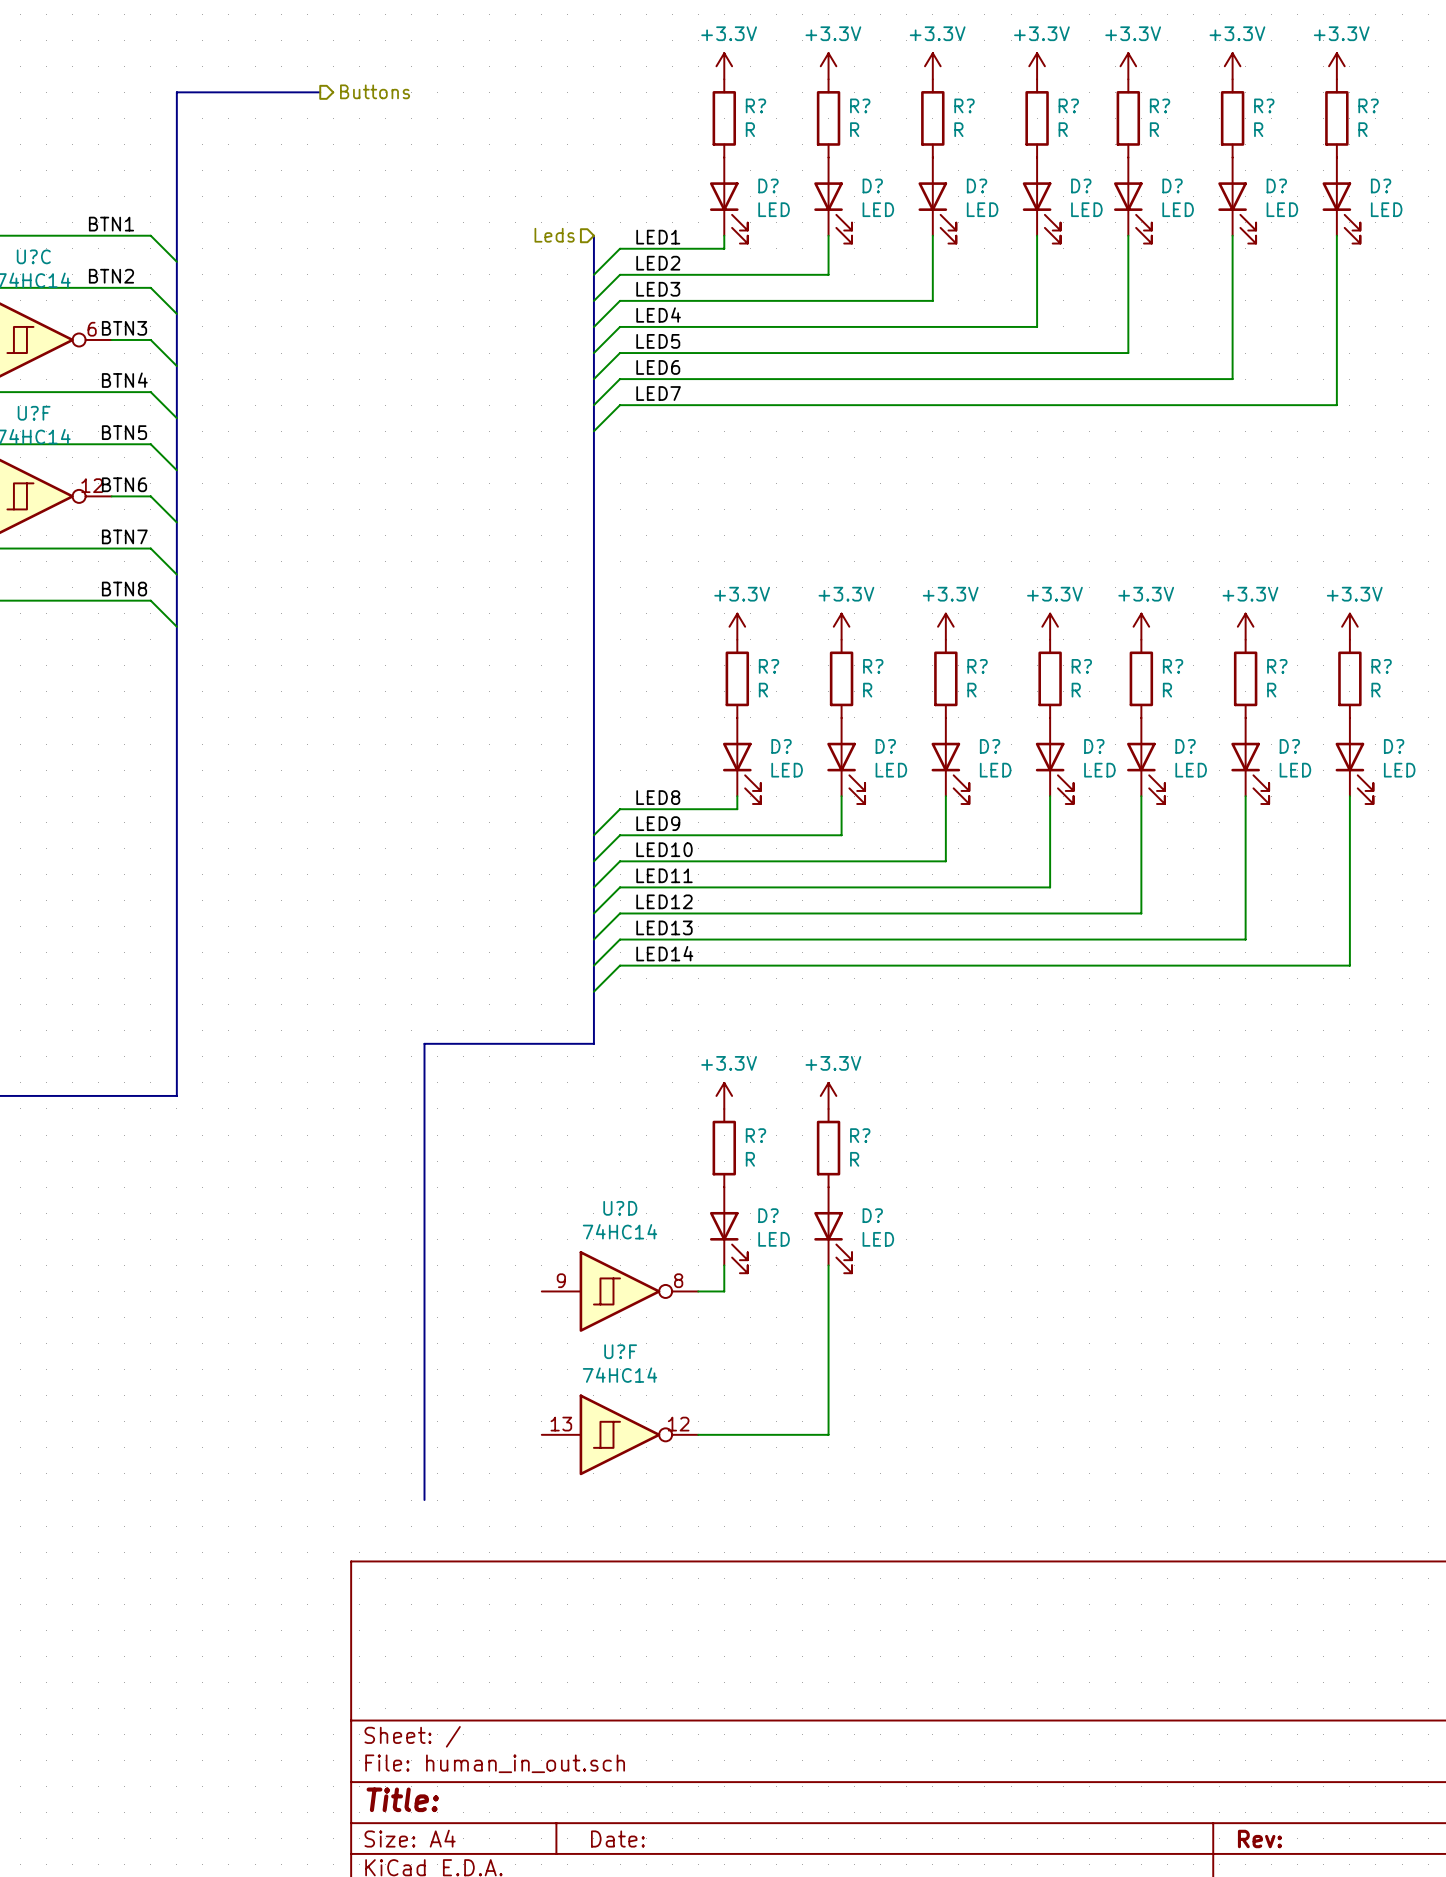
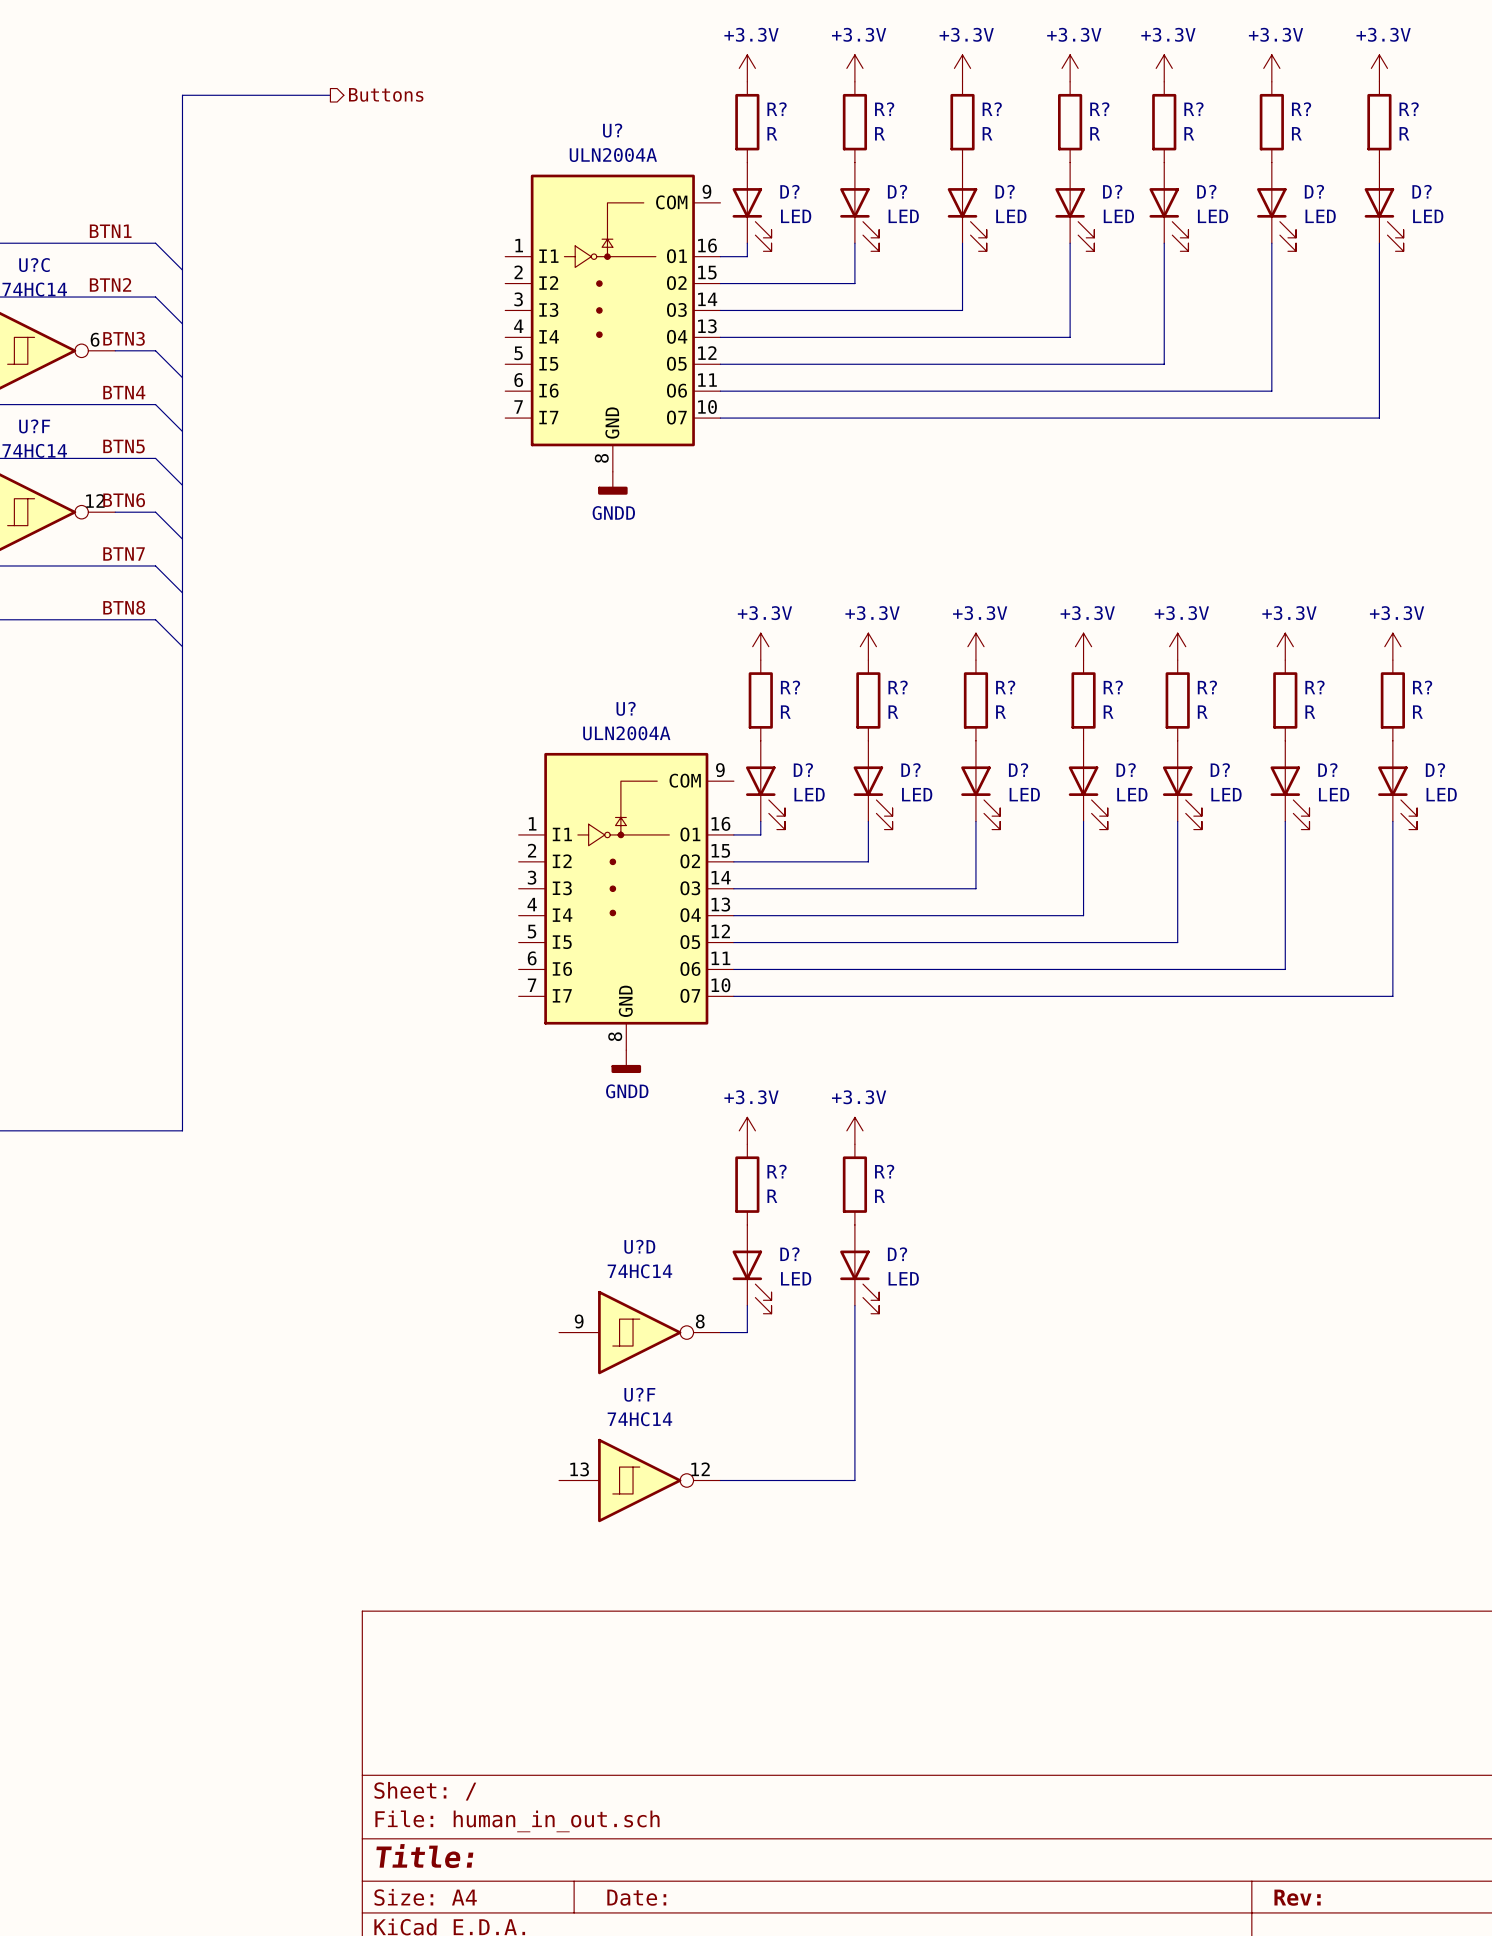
hierarchical label: Leds (554, 235) -> none
bus: (593, 235) (593, 1043) (424, 1043) (424, 1500) -> none
label: LED1 (658, 237) -> none
label: LED2 (658, 263) -> none
label: LED3 (658, 289) -> none
U?: none -> ULN2004A (612, 323)
label: LED4 (658, 315) -> none
label: LED5 (658, 341) -> none
label: LED6 (658, 367) -> none
label: LED7 (658, 393) -> none
power symbol: none -> GNDD (612, 483)
label: LED8 (658, 797) -> none
label: LED9 (658, 823) -> none
label: LED10 (664, 849) -> none
U?: none -> ULN2004A (626, 901)
label: LED11 (664, 875) -> none
label: LED12 (664, 901) -> none
label: LED13 (664, 927) -> none
label: LED14 (664, 953) -> none
power symbol: none -> GNDD (626, 1061)

